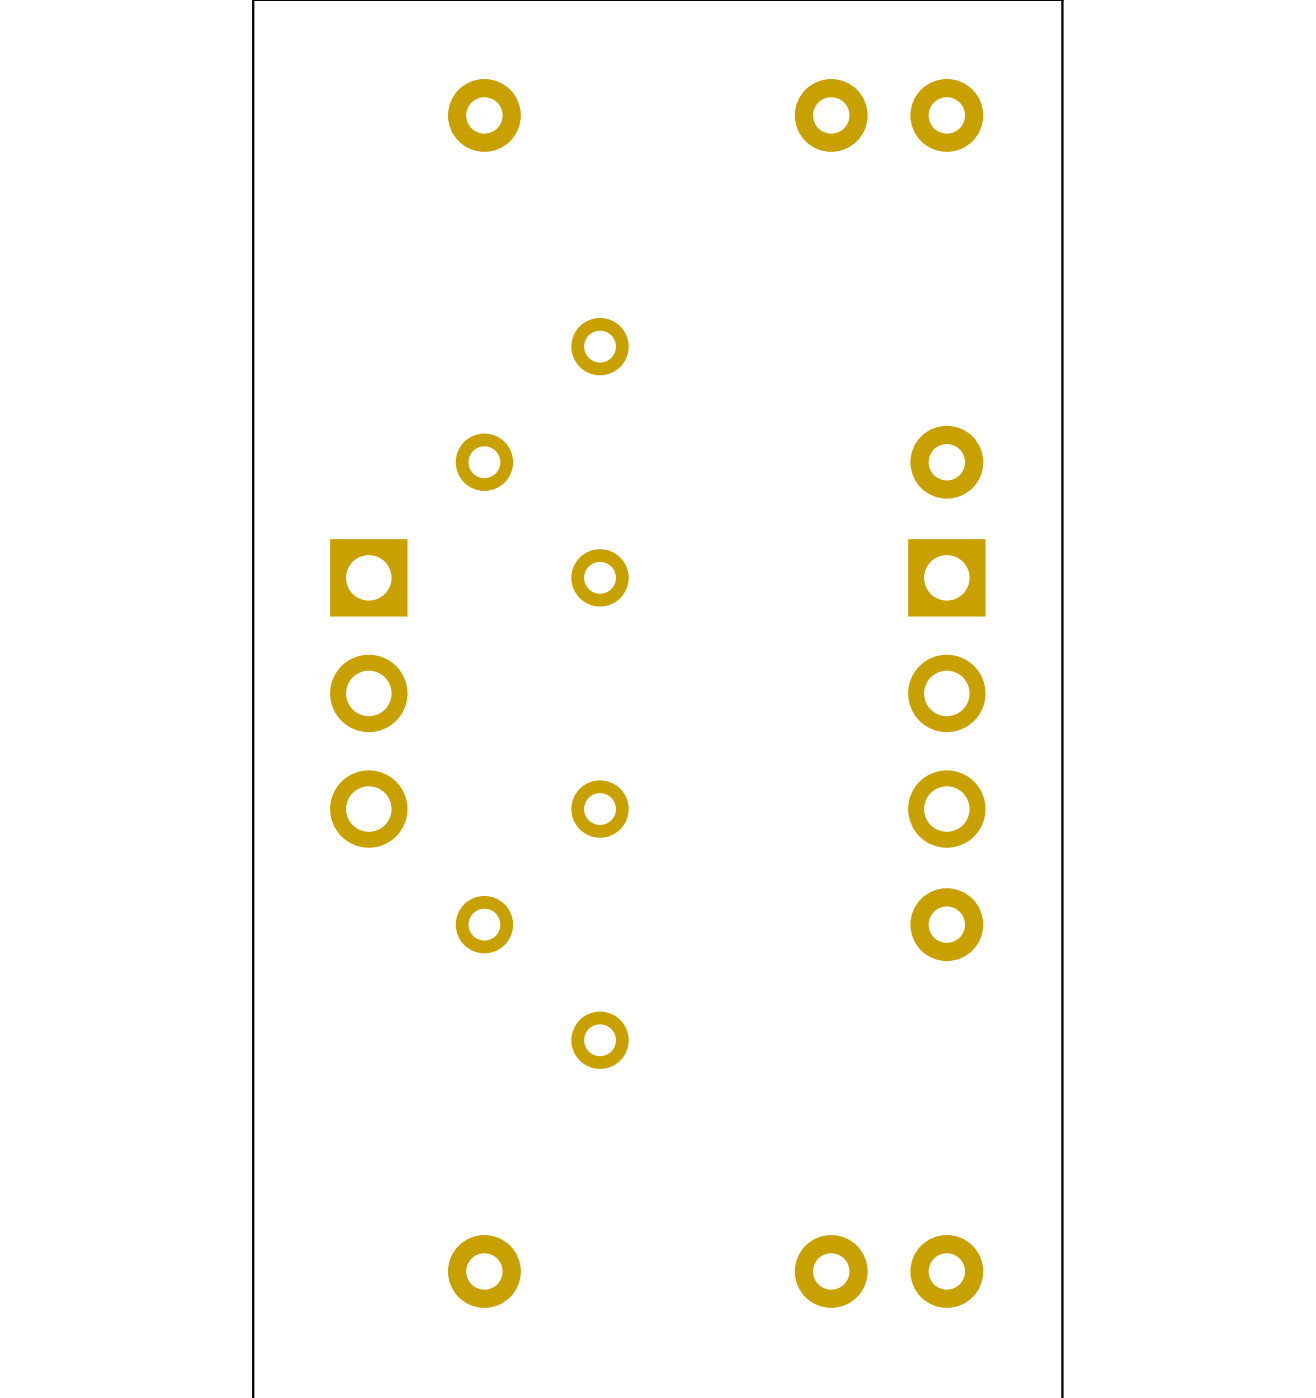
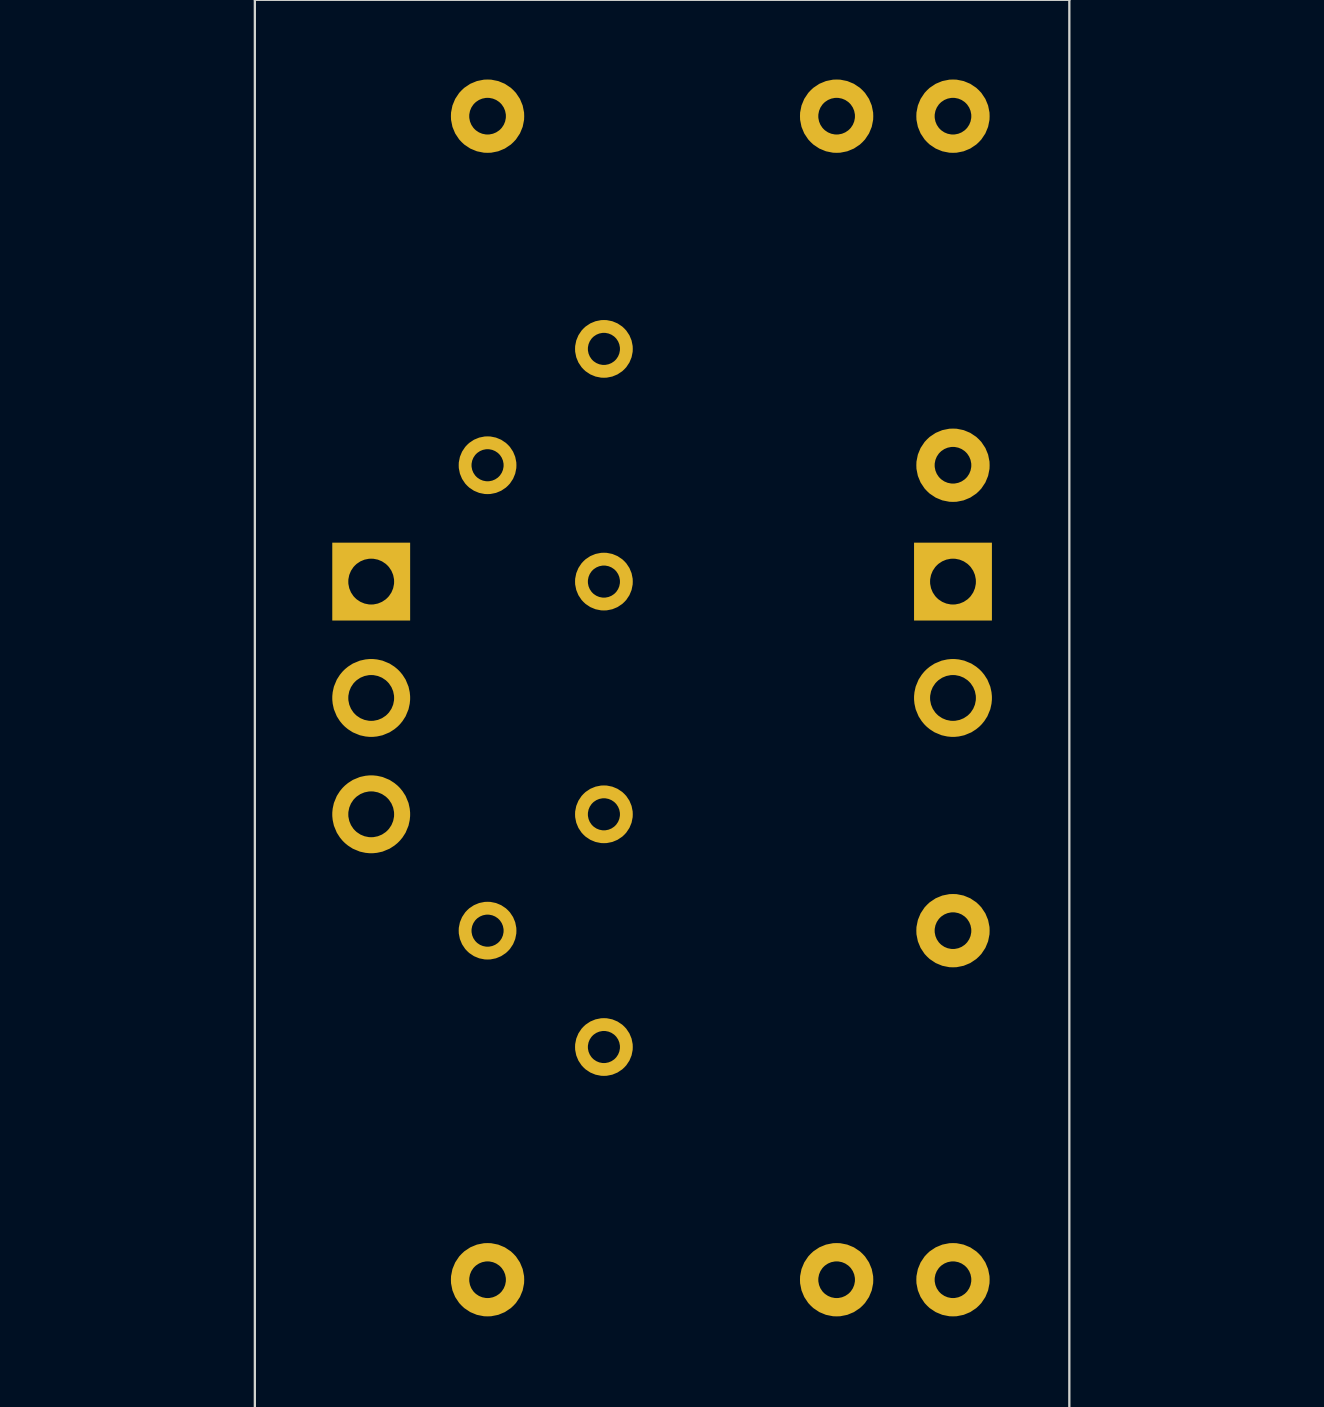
part: (946, 693) -> none

